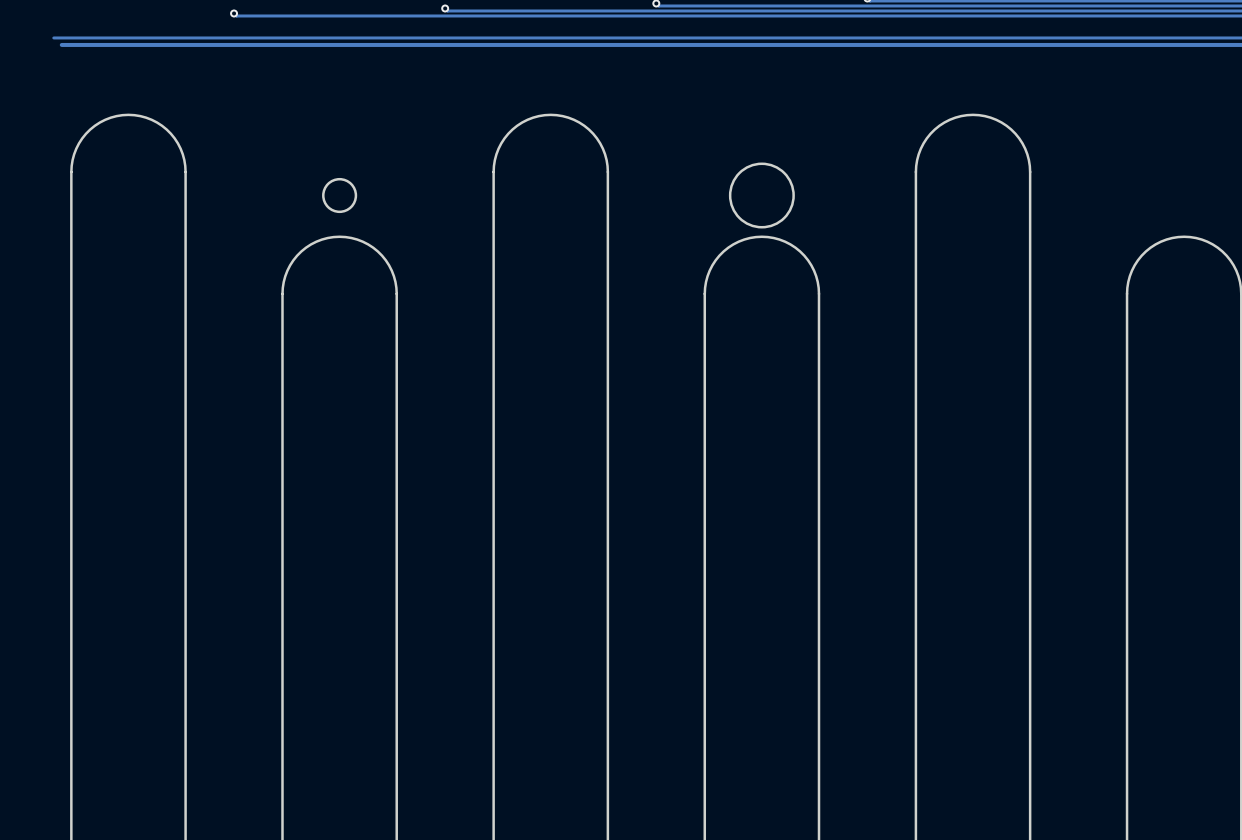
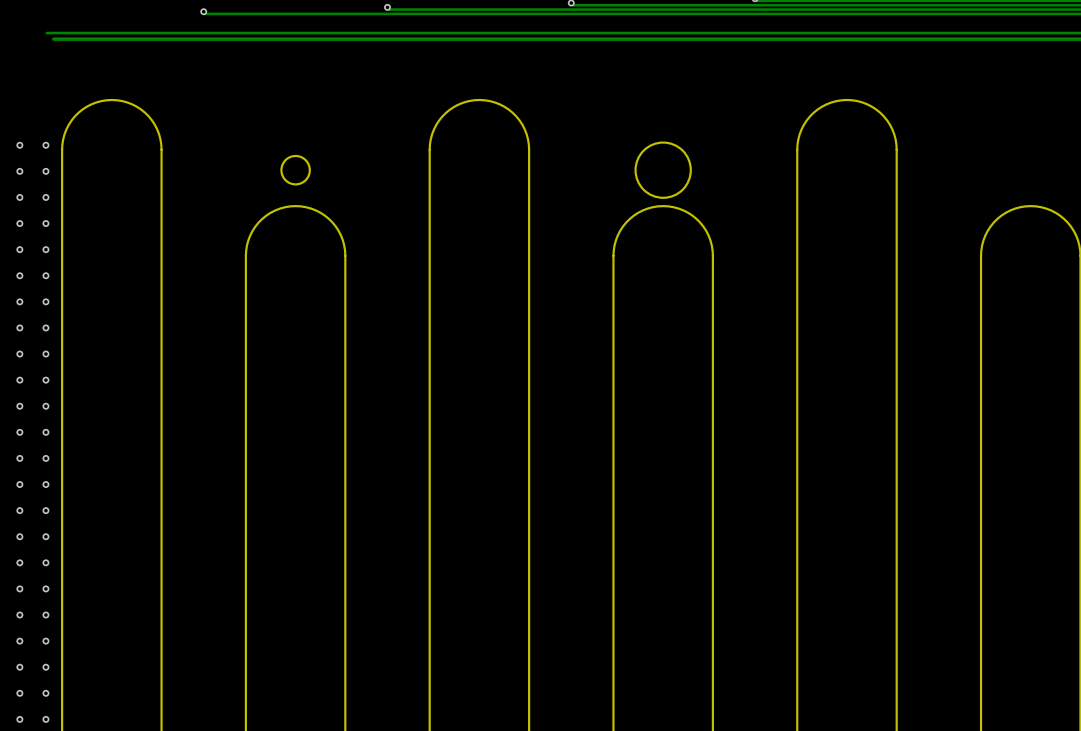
via: none -> (19, 145)
via: none -> (45, 145)
via: none -> (19, 171)
via: none -> (45, 171)
via: none -> (19, 197)
via: none -> (45, 197)
via: none -> (19, 223)
via: none -> (45, 223)
via: none -> (19, 249)
via: none -> (45, 249)
via: none -> (19, 275)
via: none -> (45, 275)
via: none -> (19, 301)
via: none -> (45, 301)
via: none -> (19, 327)
via: none -> (45, 327)
via: none -> (19, 354)
via: none -> (45, 354)
via: none -> (19, 380)
via: none -> (45, 380)
via: none -> (19, 406)
via: none -> (45, 406)
via: none -> (19, 432)
via: none -> (45, 432)
via: none -> (19, 458)
via: none -> (45, 458)
via: none -> (19, 484)
via: none -> (45, 484)
via: none -> (19, 510)
via: none -> (45, 510)
via: none -> (19, 536)
via: none -> (45, 536)
via: none -> (19, 562)
via: none -> (45, 562)
via: none -> (19, 588)
via: none -> (45, 588)
via: none -> (19, 615)
via: none -> (45, 615)
via: none -> (19, 641)
via: none -> (45, 641)
via: none -> (19, 667)
via: none -> (45, 667)
via: none -> (19, 693)
via: none -> (45, 693)
via: none -> (19, 719)
via: none -> (45, 719)

